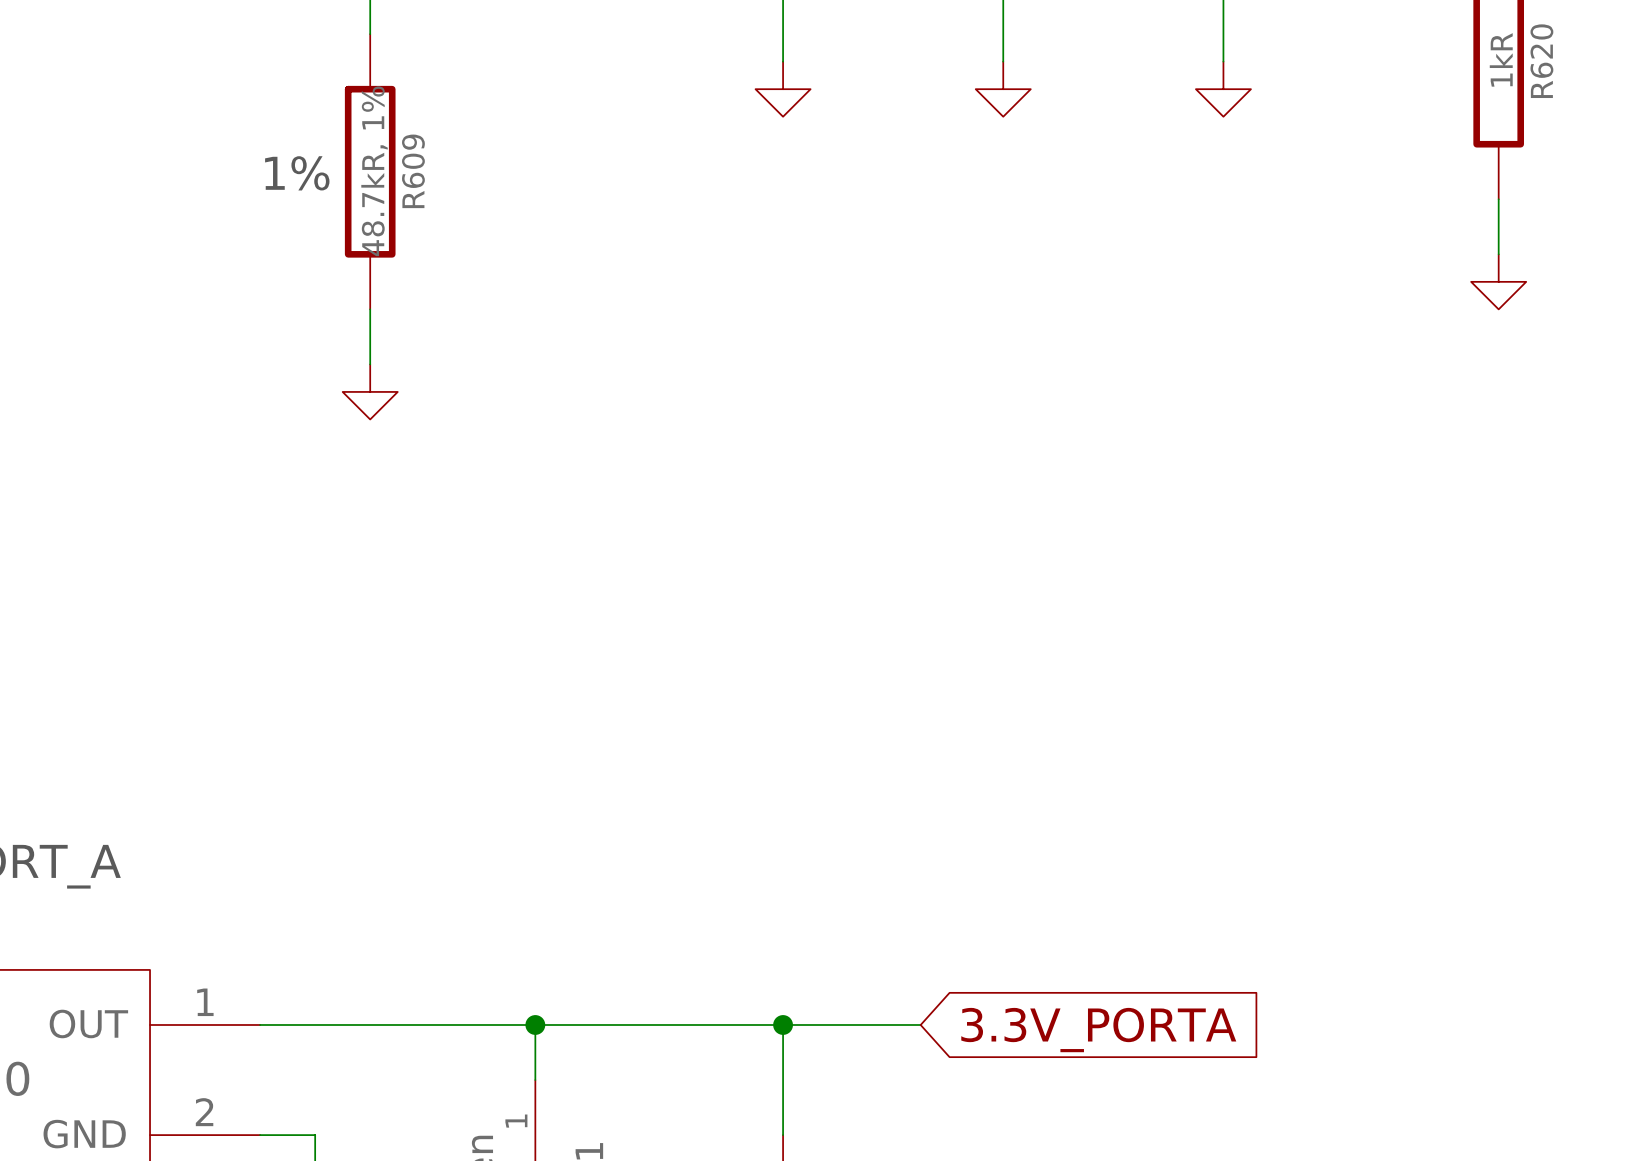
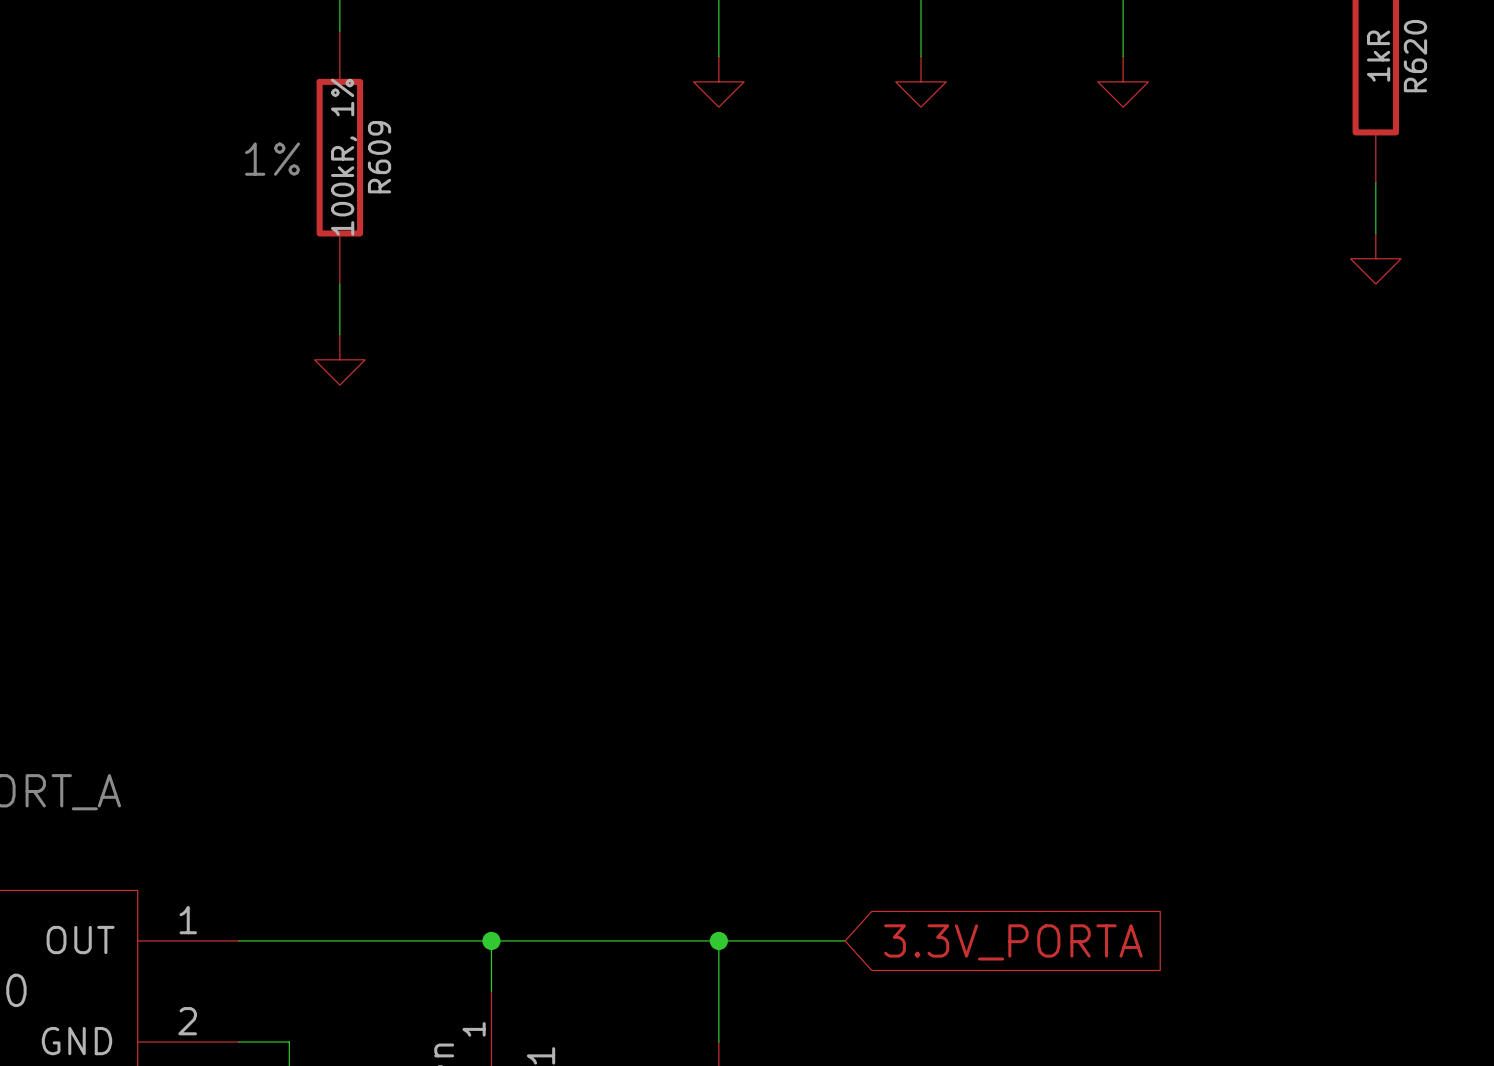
R609 value: 48.7kR, 1% (374, 171) -> 100kR, 1% (344, 157)

